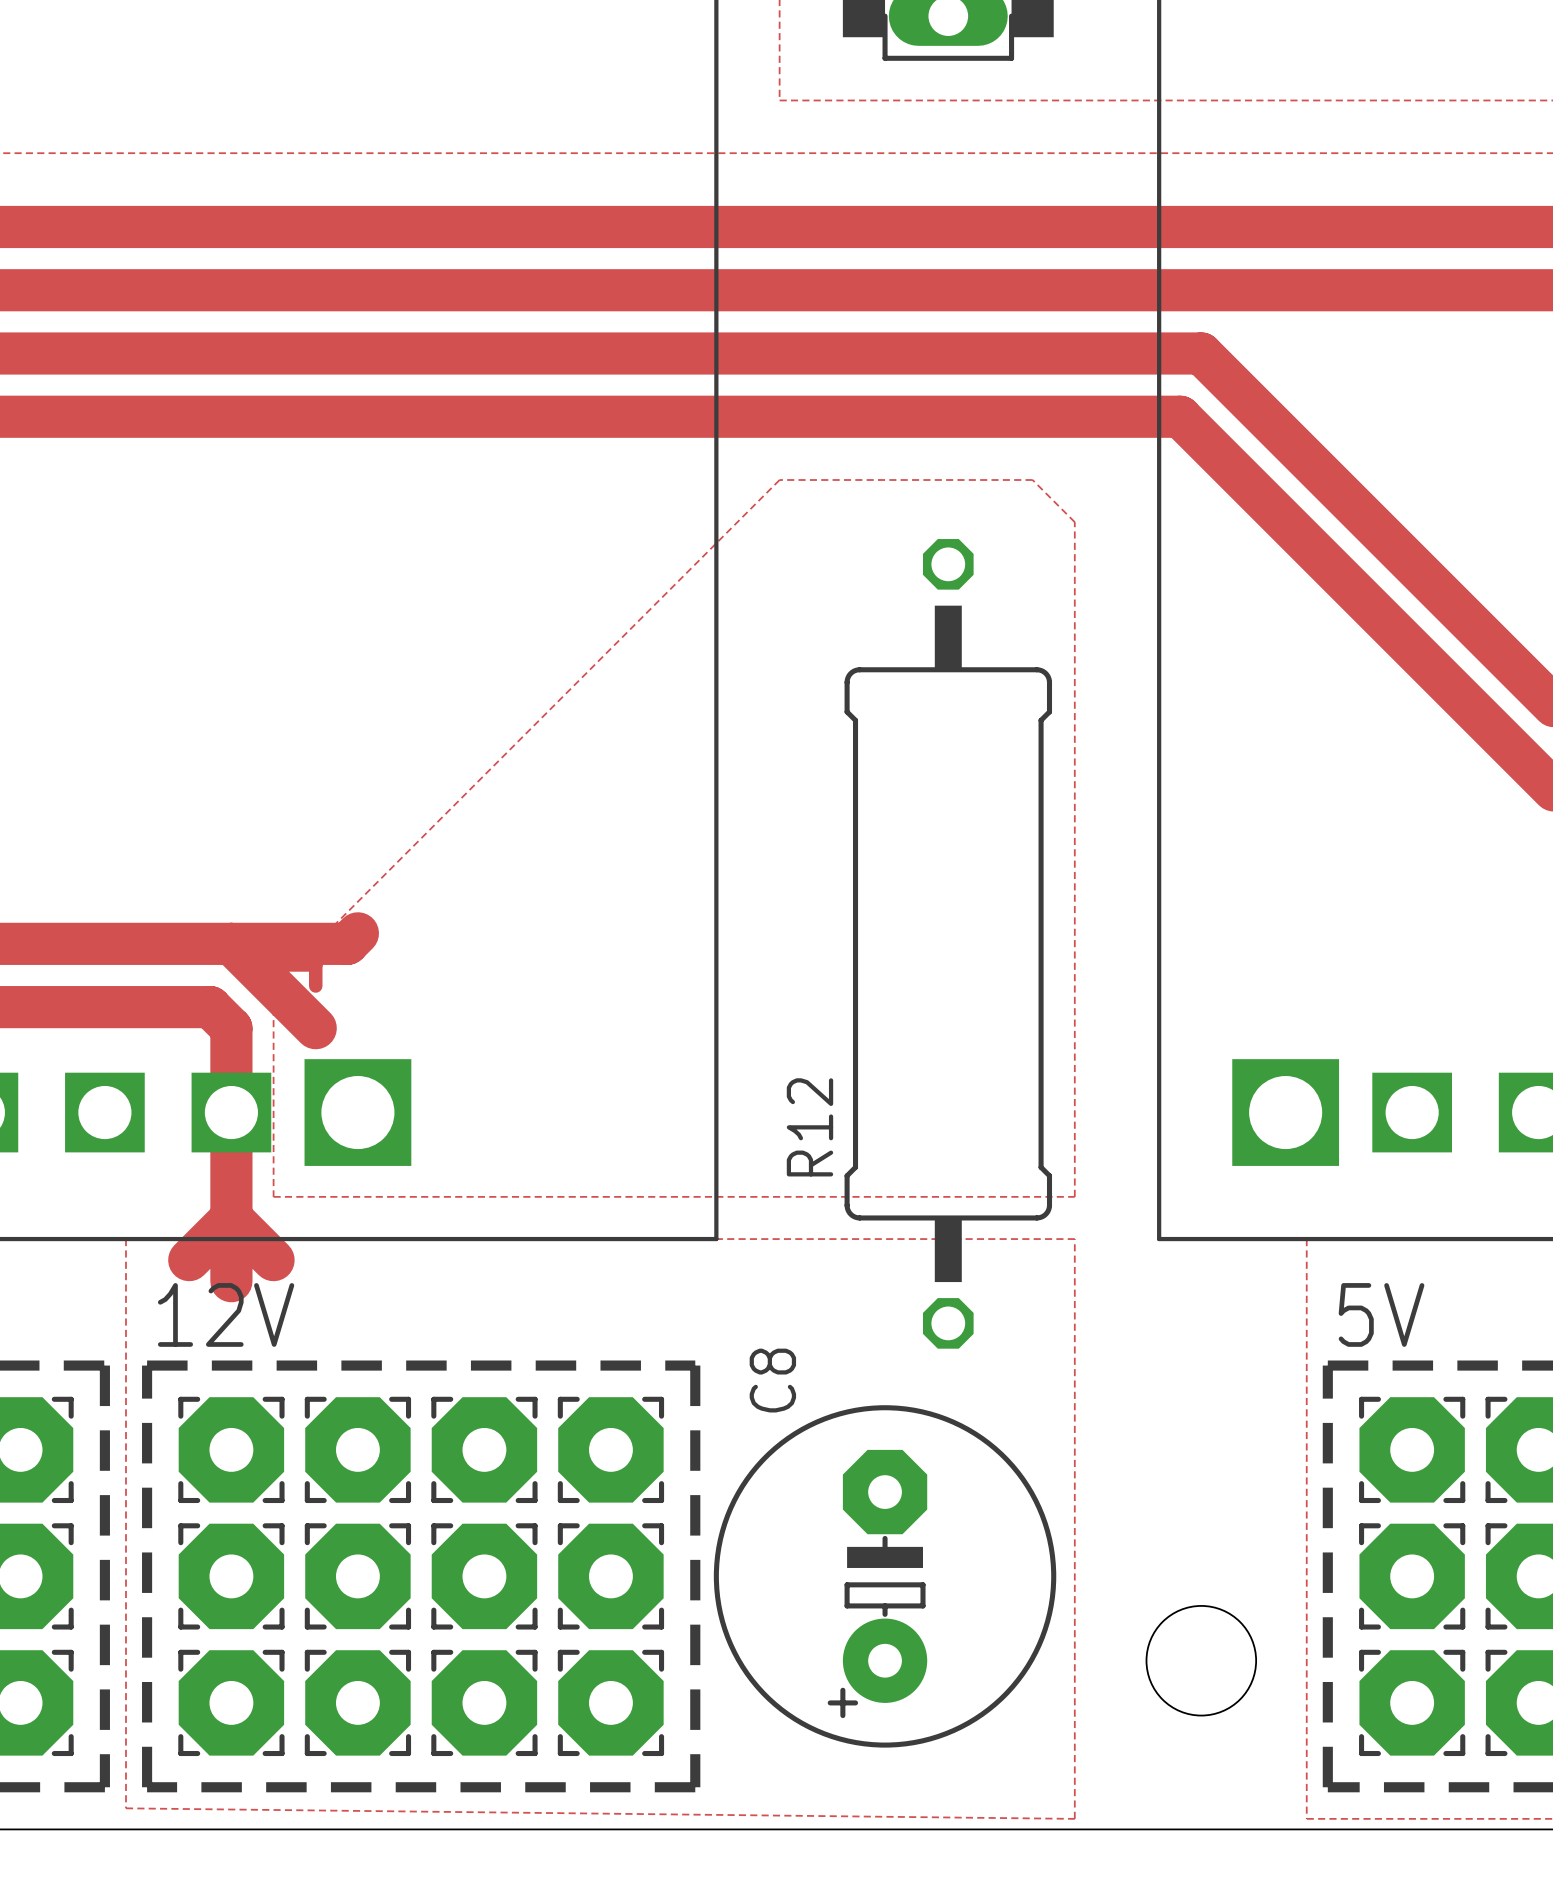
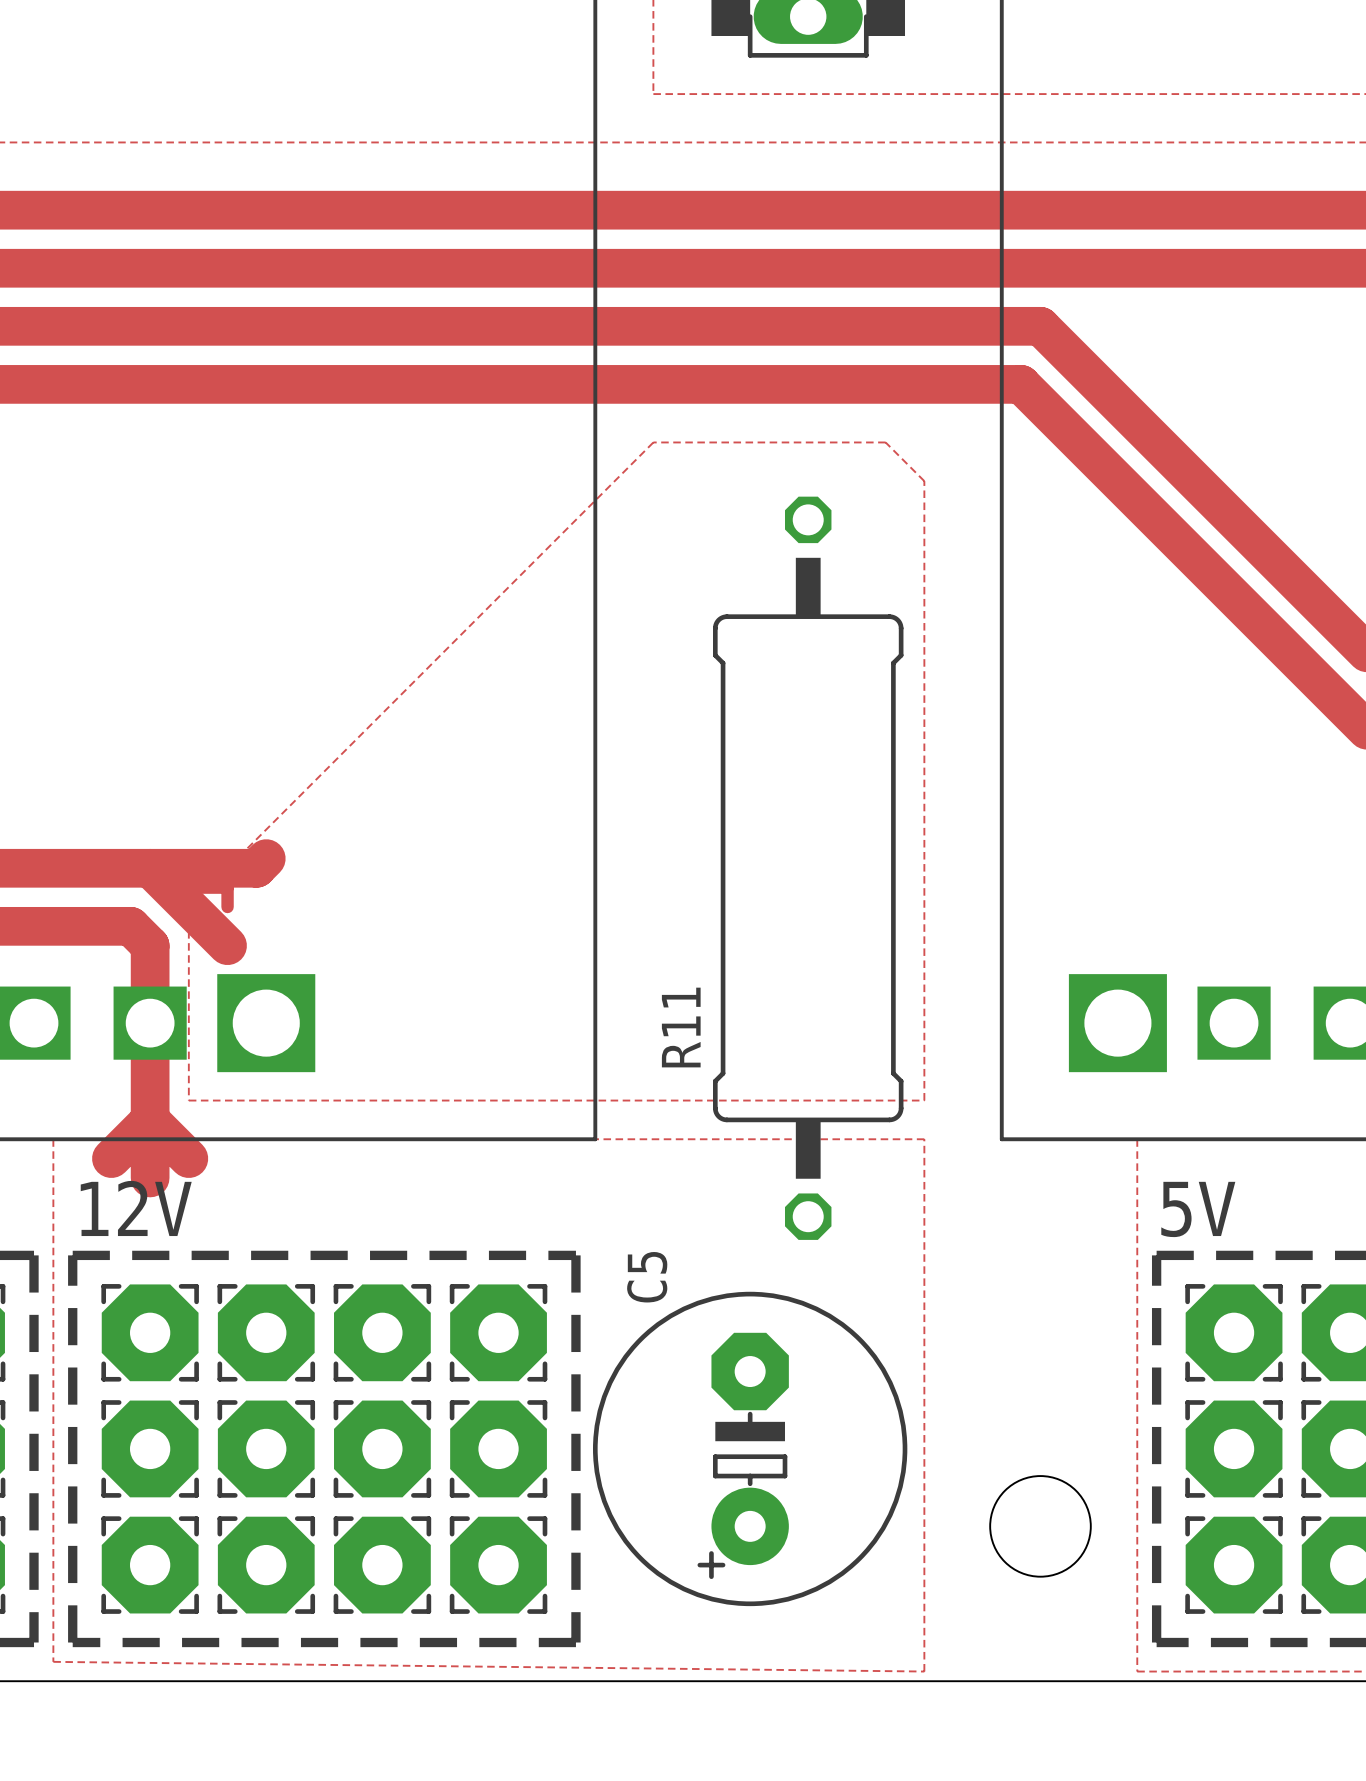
R12 name: R12 (809, 1127) -> R11 (681, 1027)
C8 name: C8 (772, 1380) -> C5 (647, 1277)

